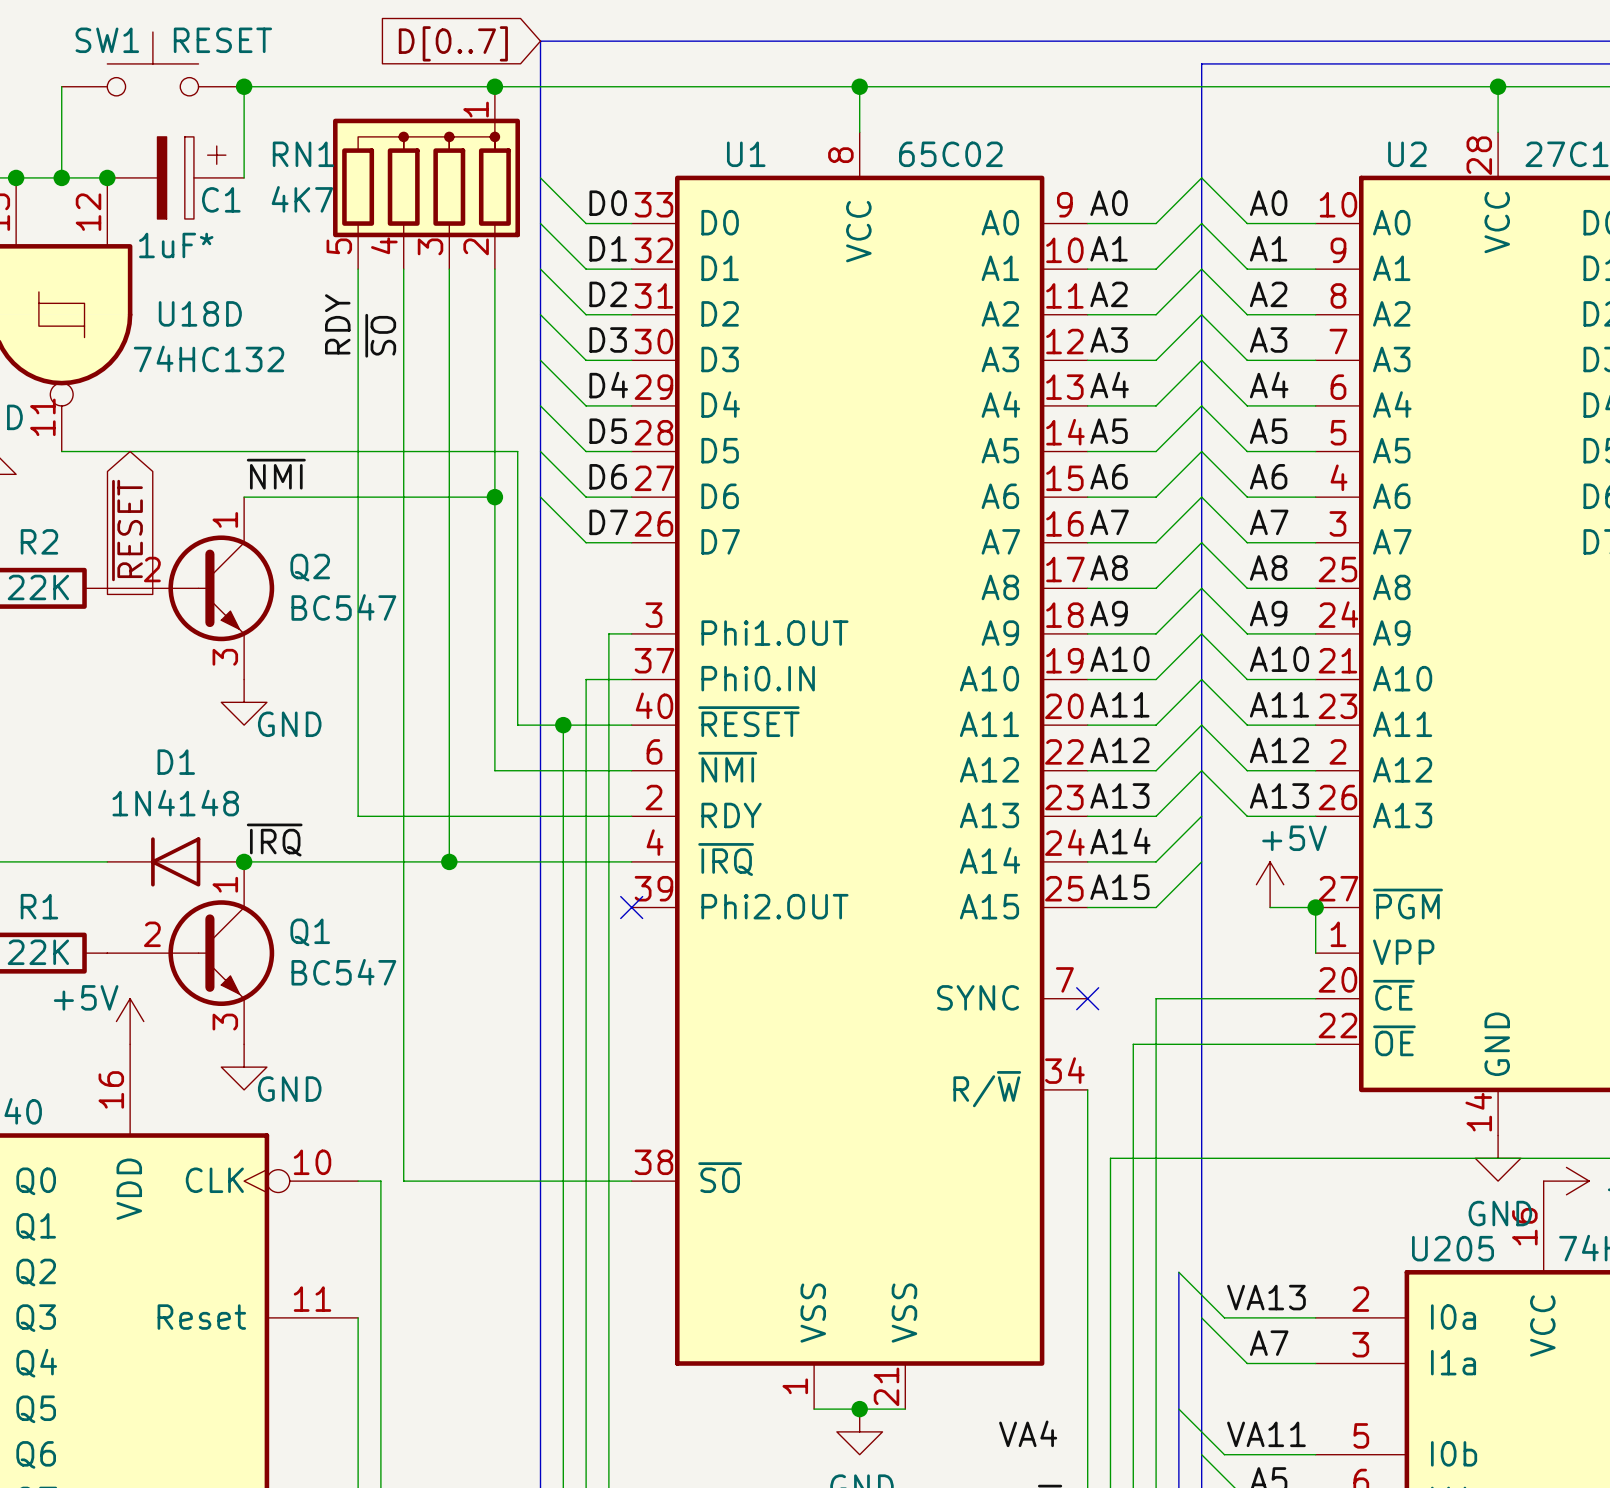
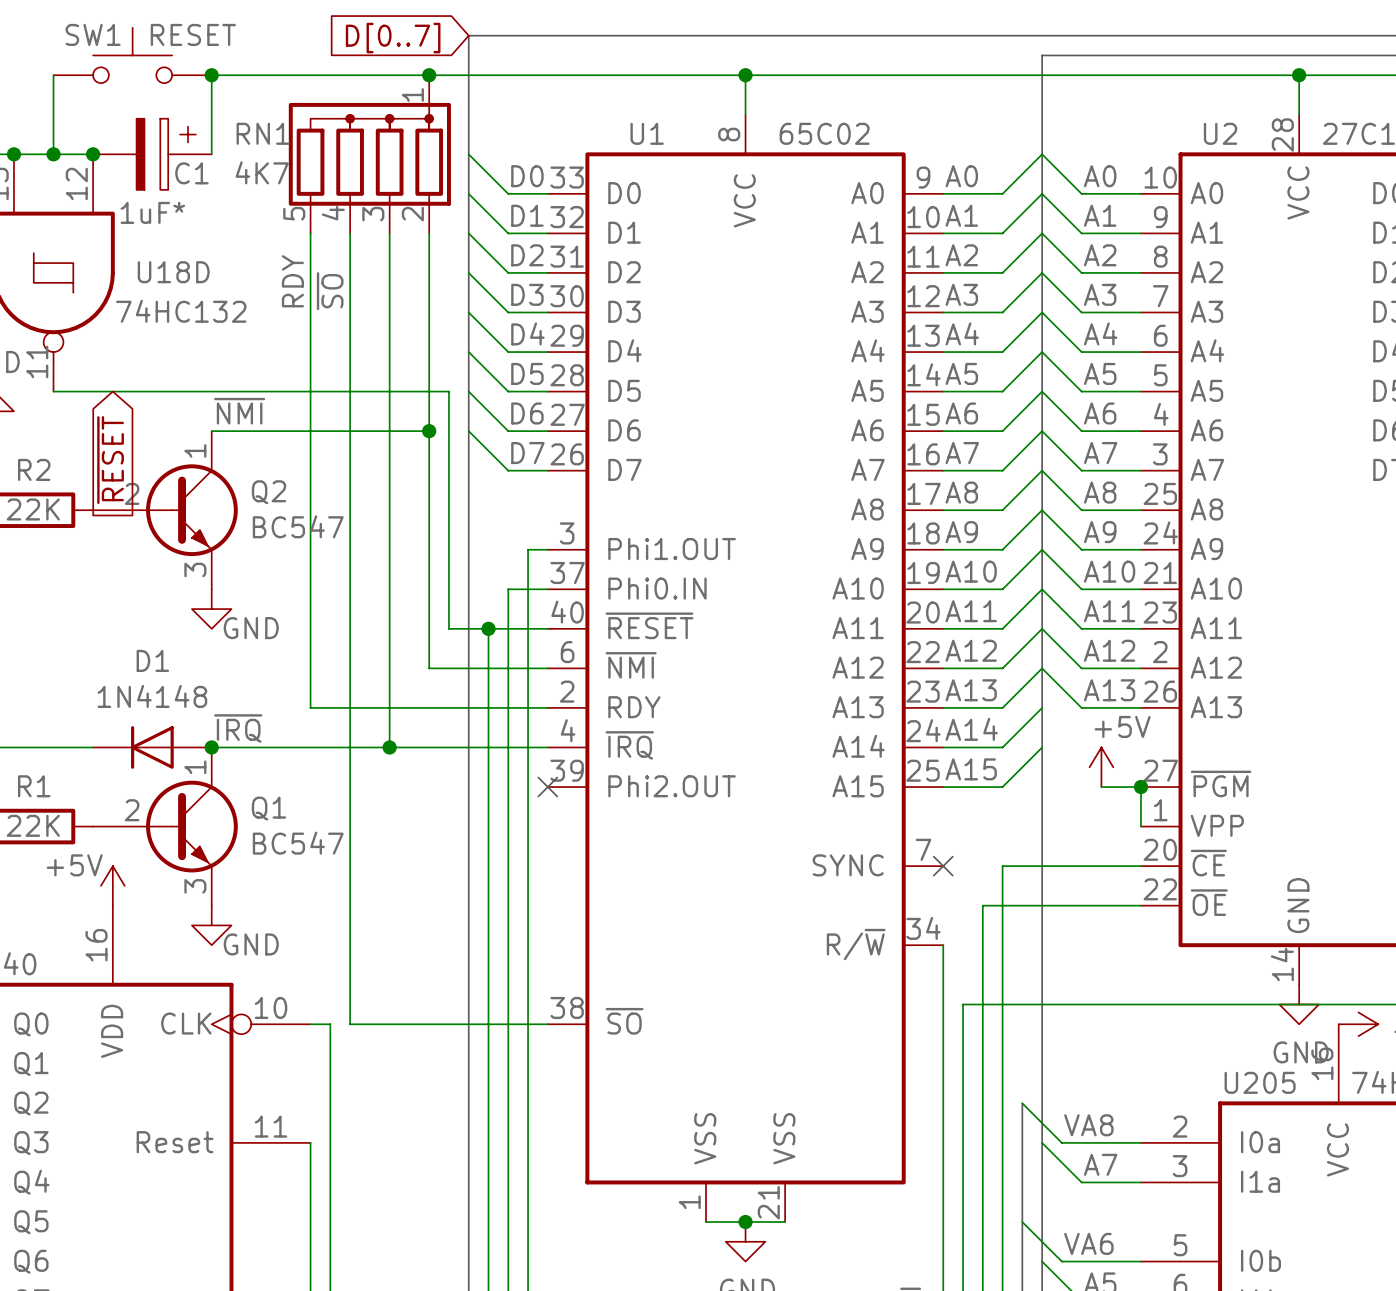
label: VA13 (1266, 1297) -> VA8 (1088, 1125)
label: VA4 (1028, 1433) -> none
label: VA11 (1266, 1434) -> VA6 (1088, 1243)

